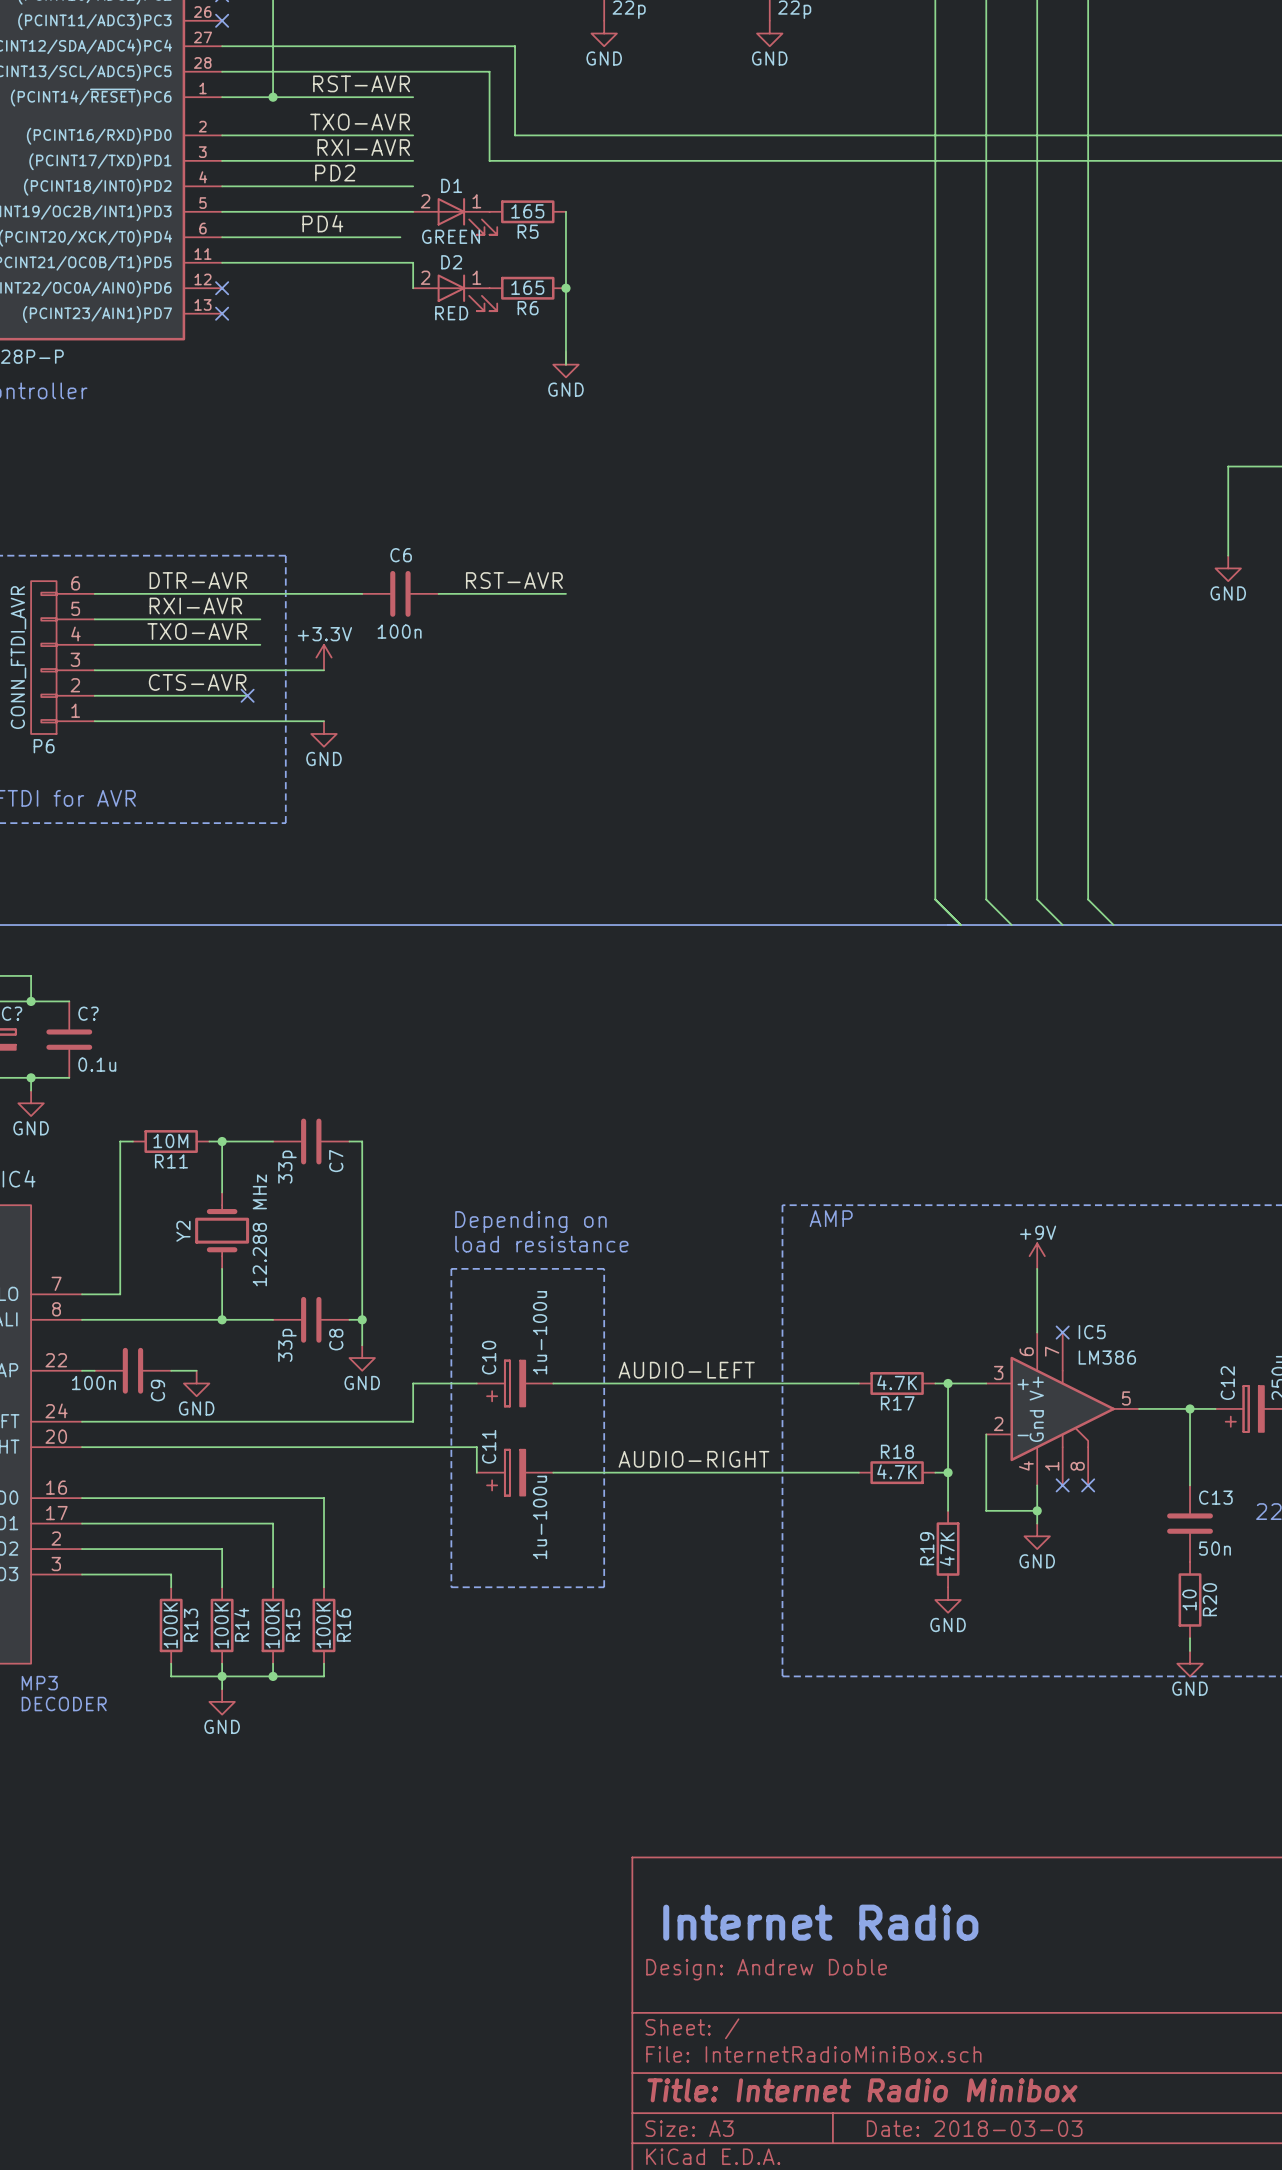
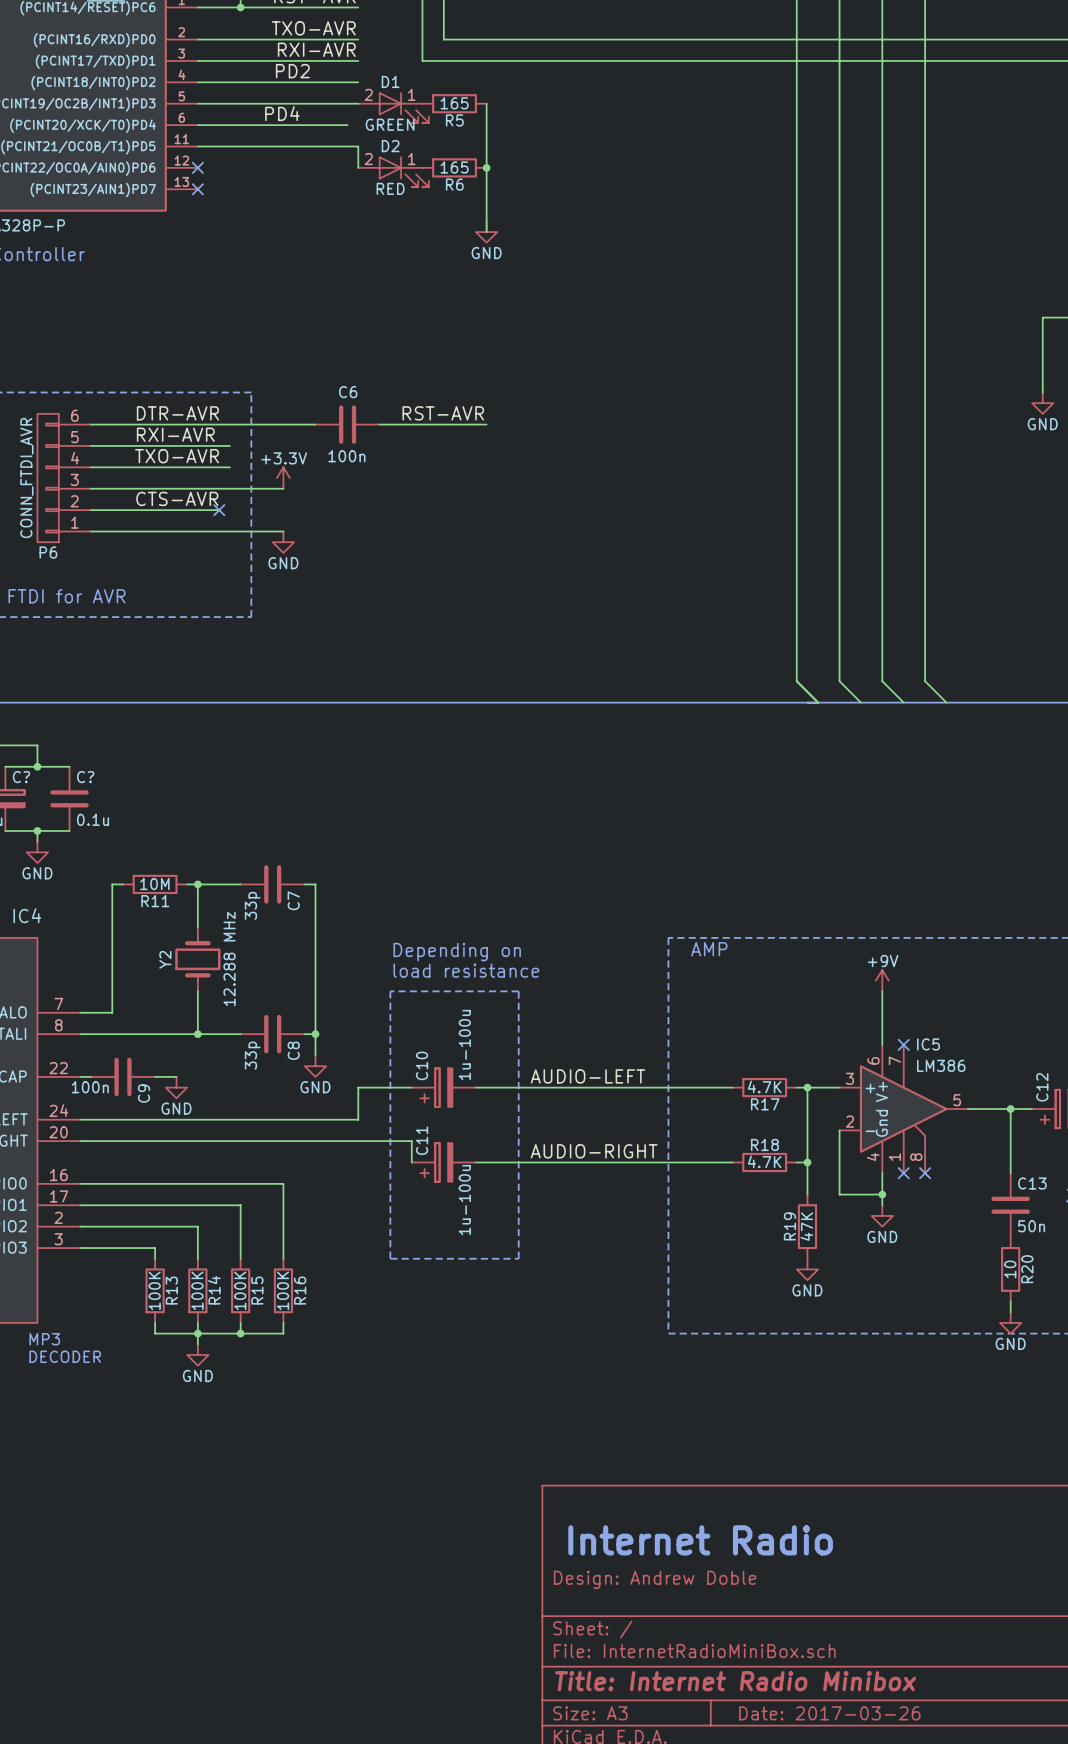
title block: Date: 2018-03-03 (974, 2128) -> Date: 2017-03-26 (829, 1713)

